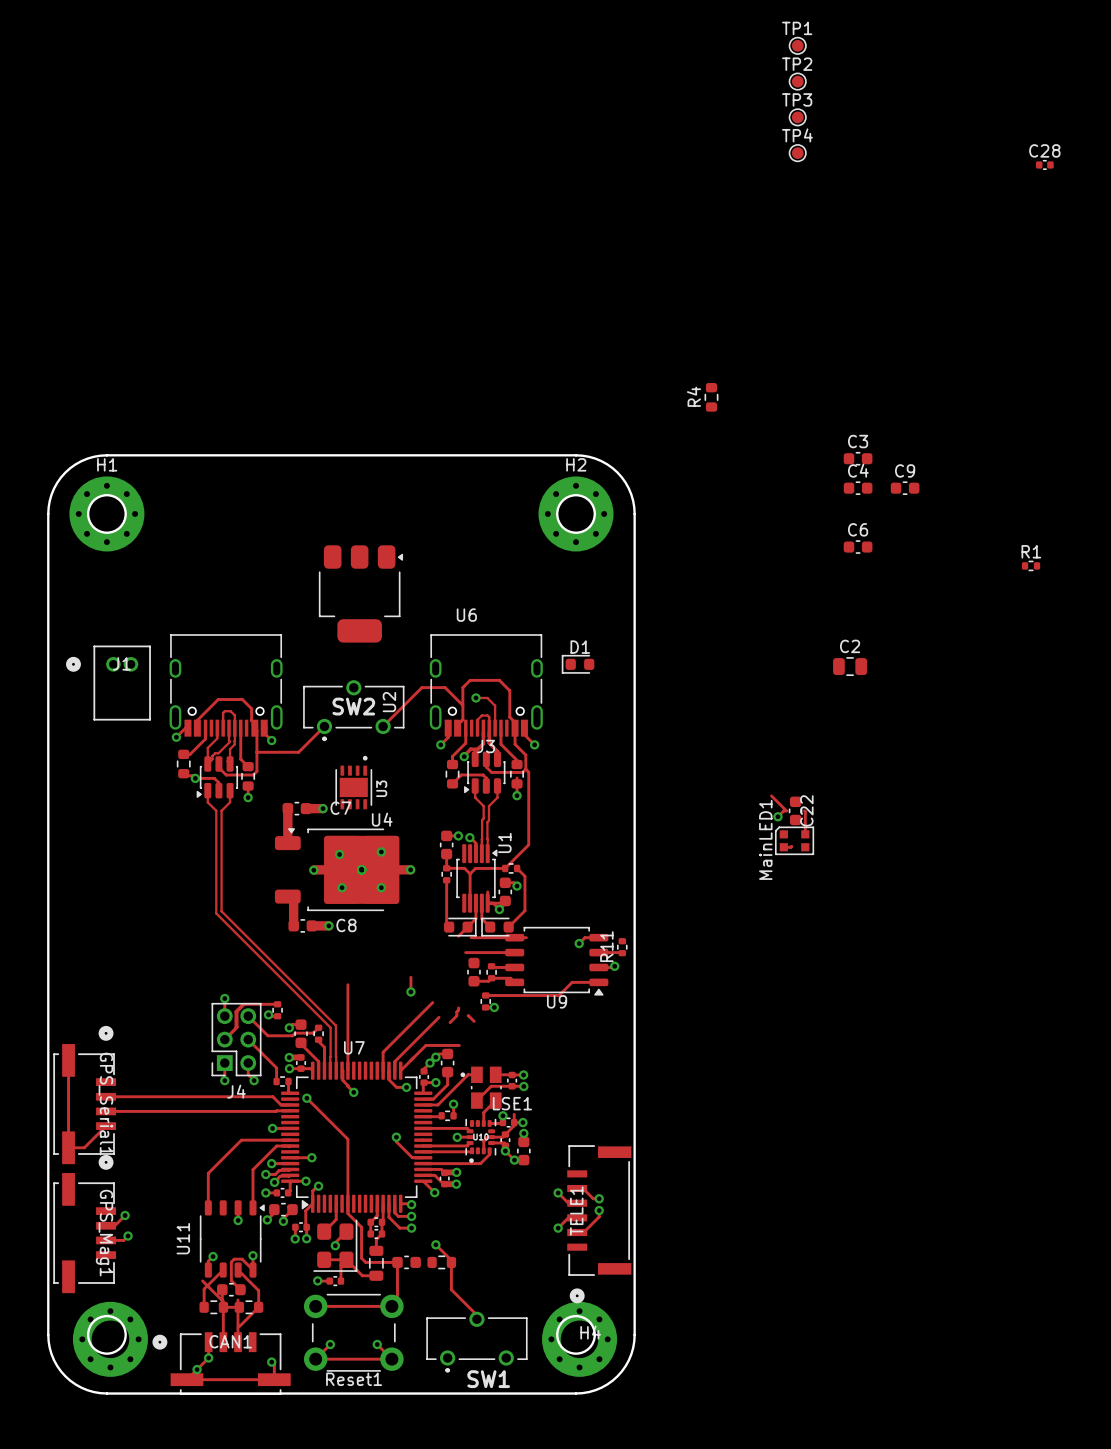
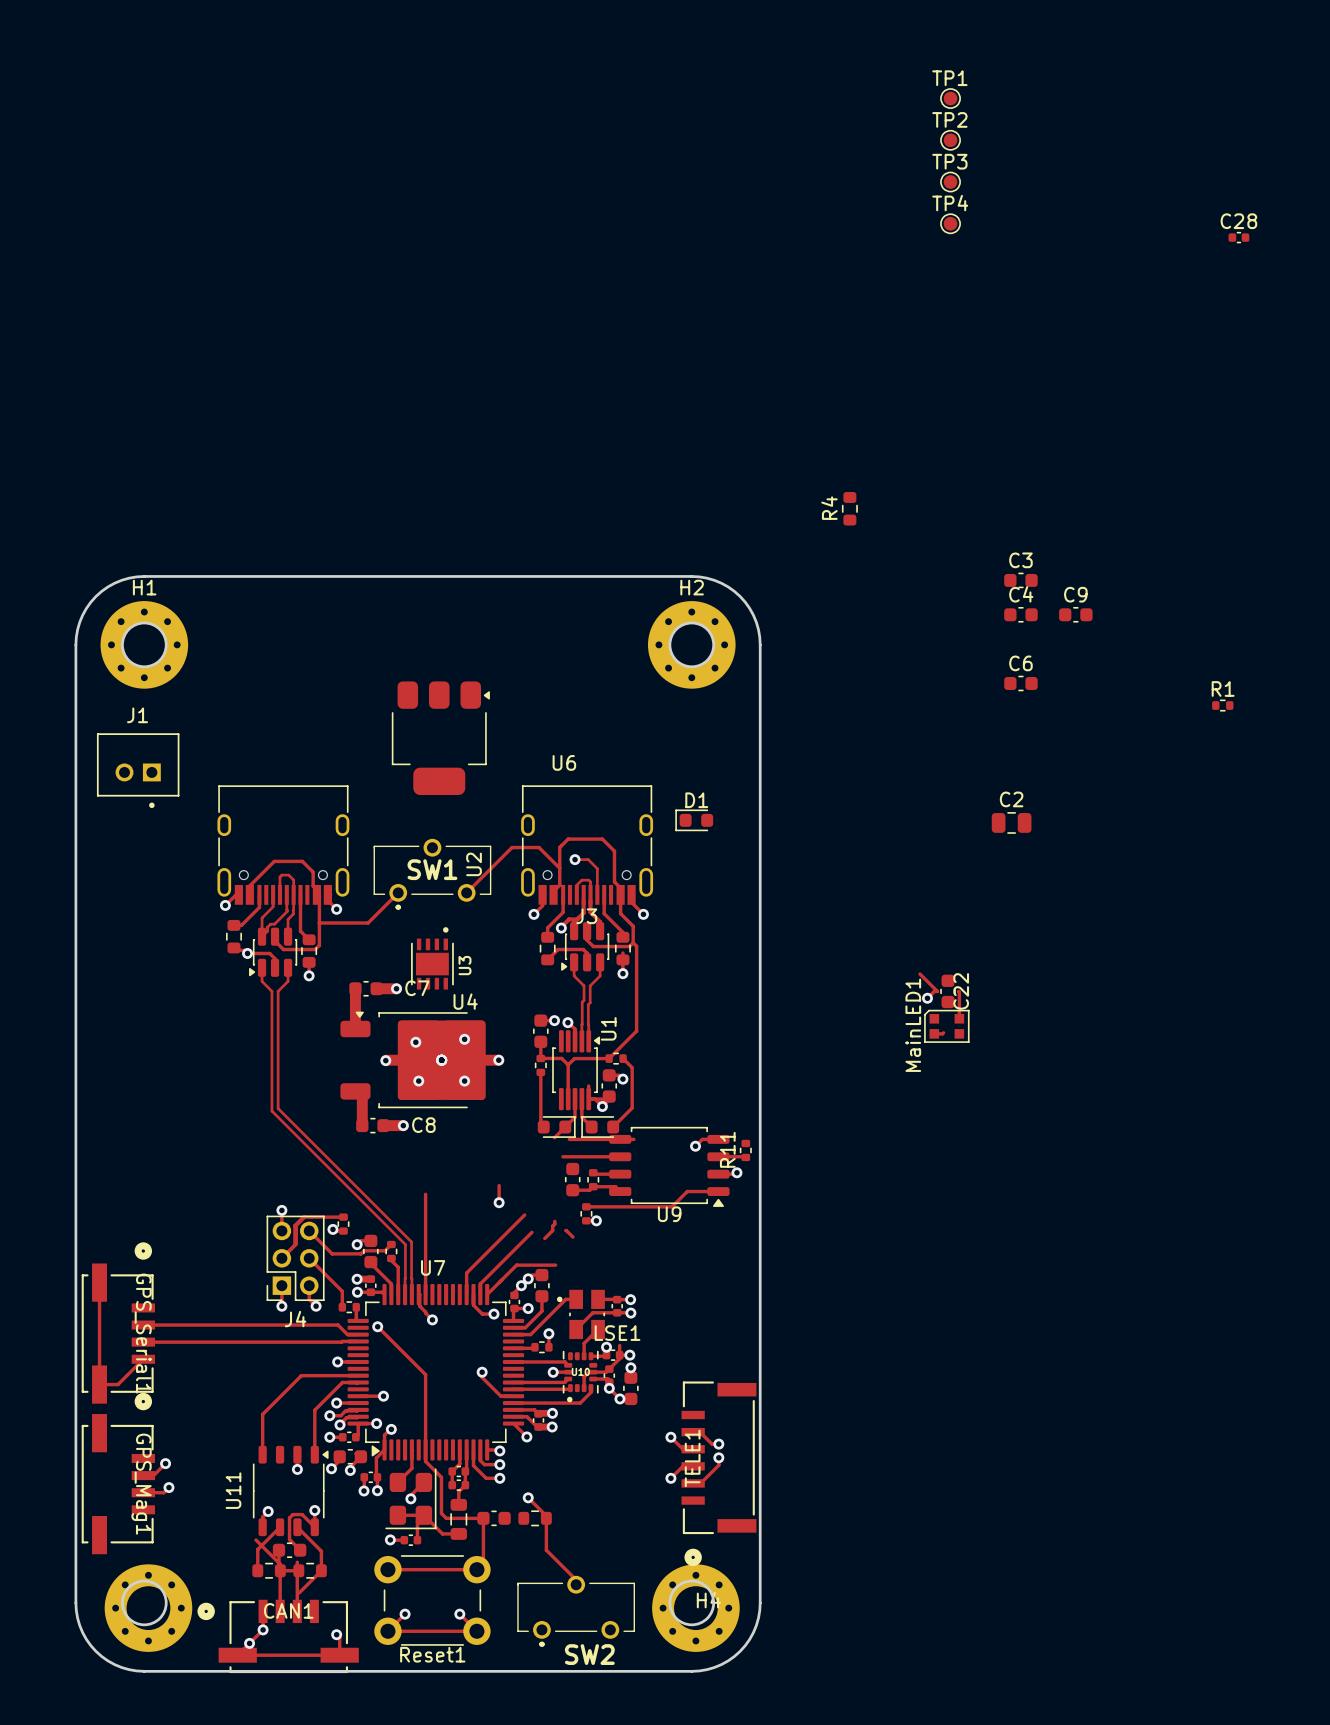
J1 footprint: [66, 645, 151, 721] -> [96, 733, 180, 809]
J1 name position: J1 (121, 663) -> J1 (137, 715)
SW2 name: SW2 (353, 706) -> SW1 (432, 869)
SW1 name: SW1 (488, 1379) -> SW2 (589, 1654)

